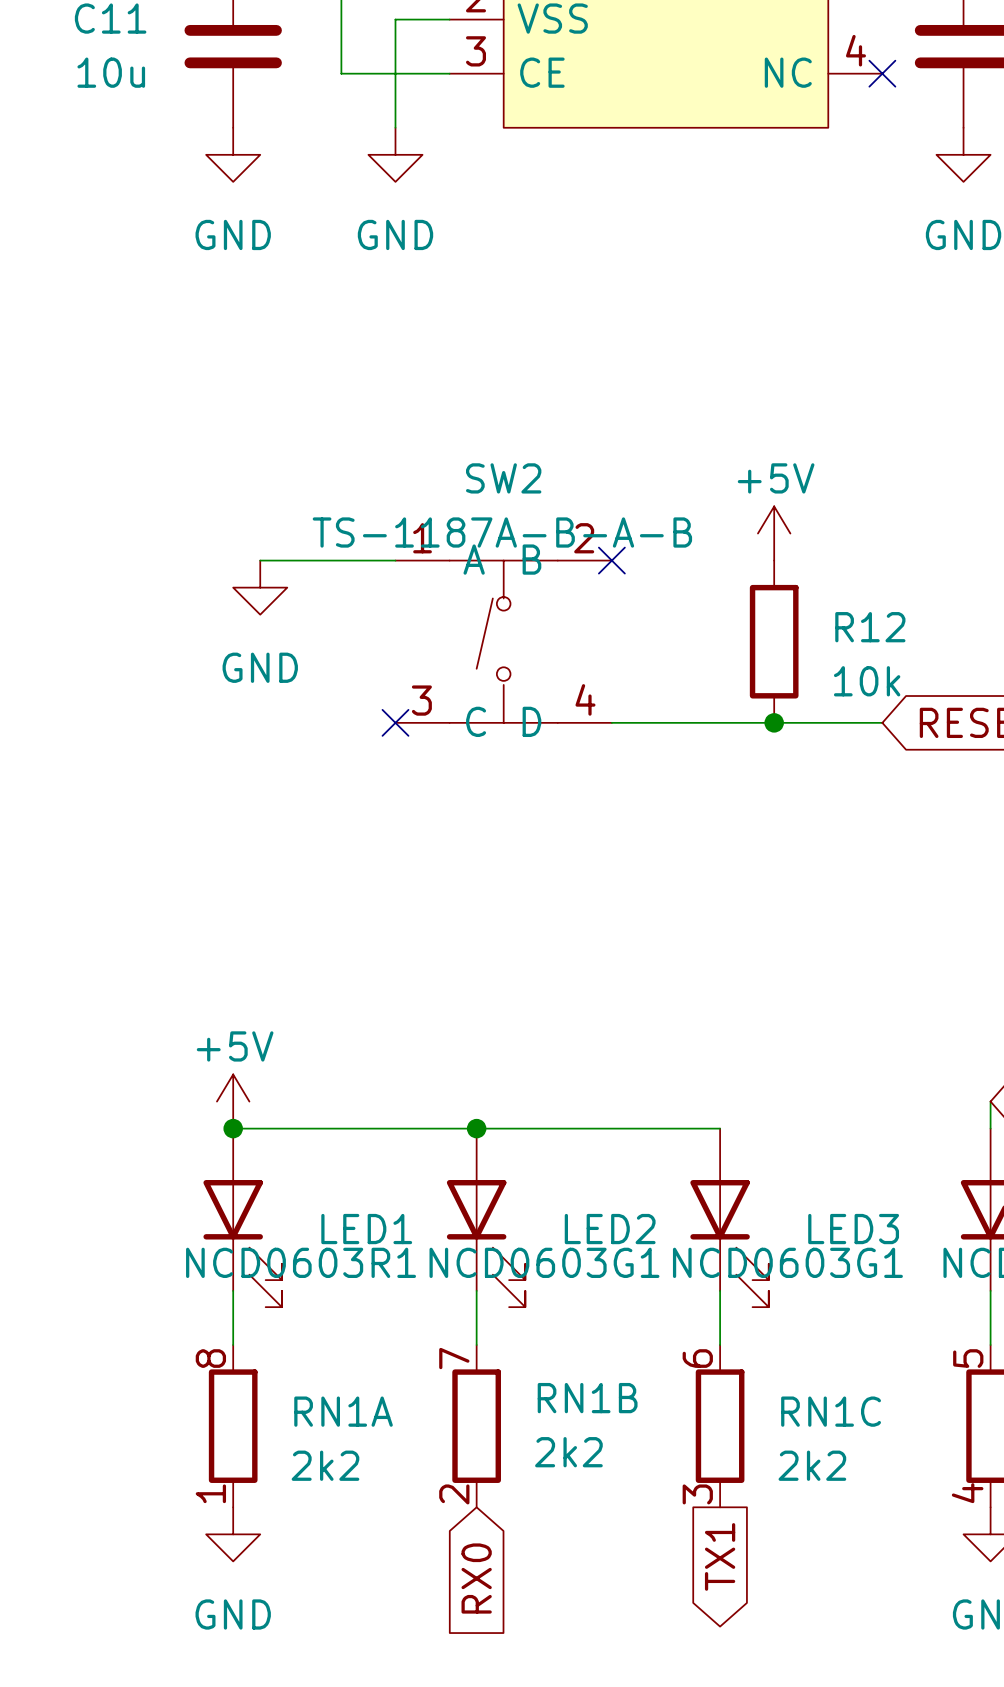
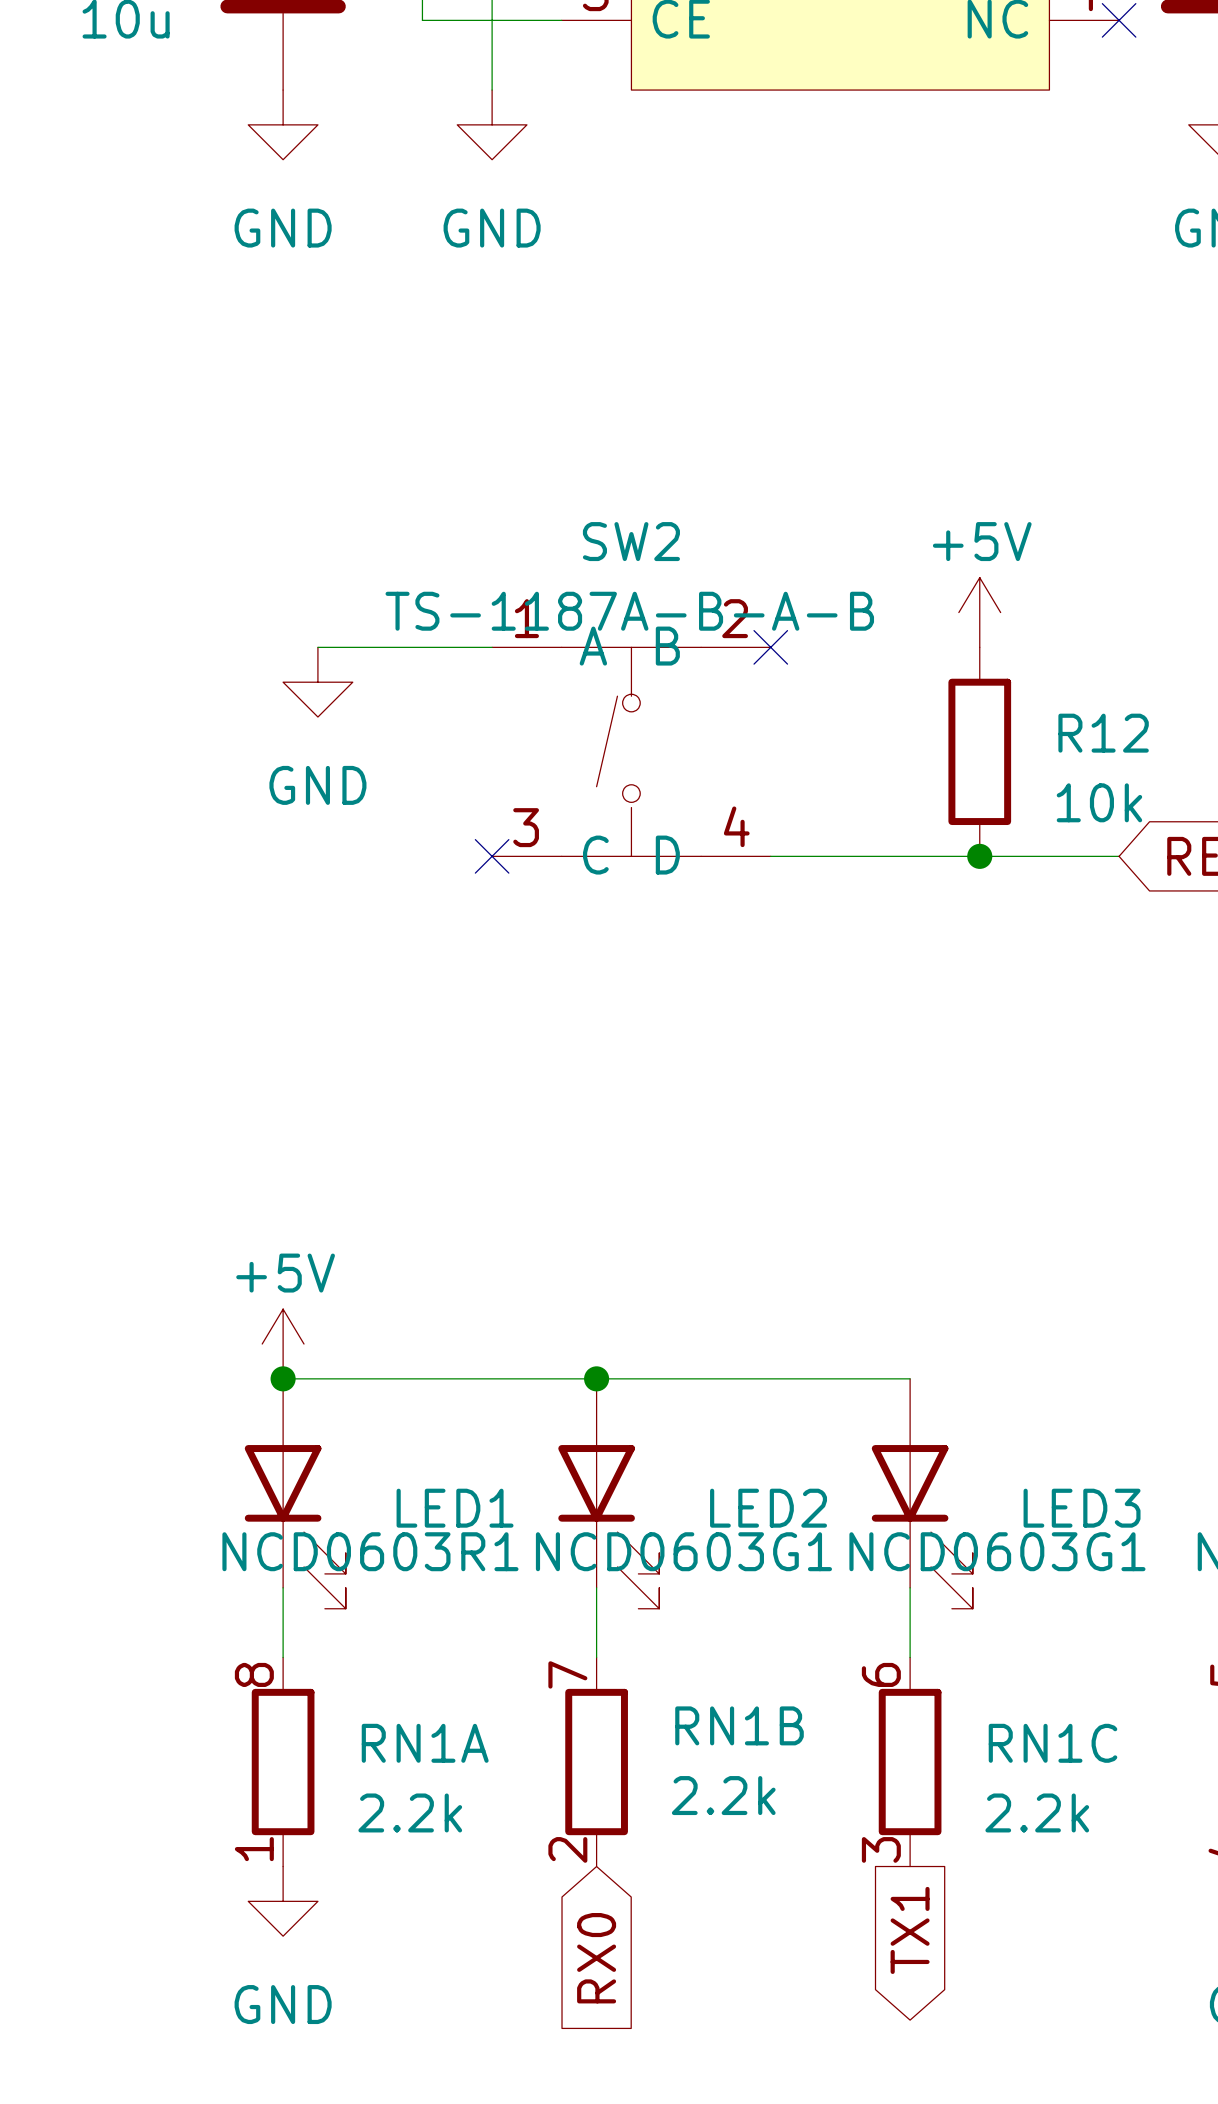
RN1B value: 2k2 (568, 1452) -> 2.2k (723, 1795)
RN1A value: 2k2 (325, 1465) -> 2.2k (410, 1812)
RN1C value: 2k2 (812, 1465) -> 2.2k (1037, 1812)

